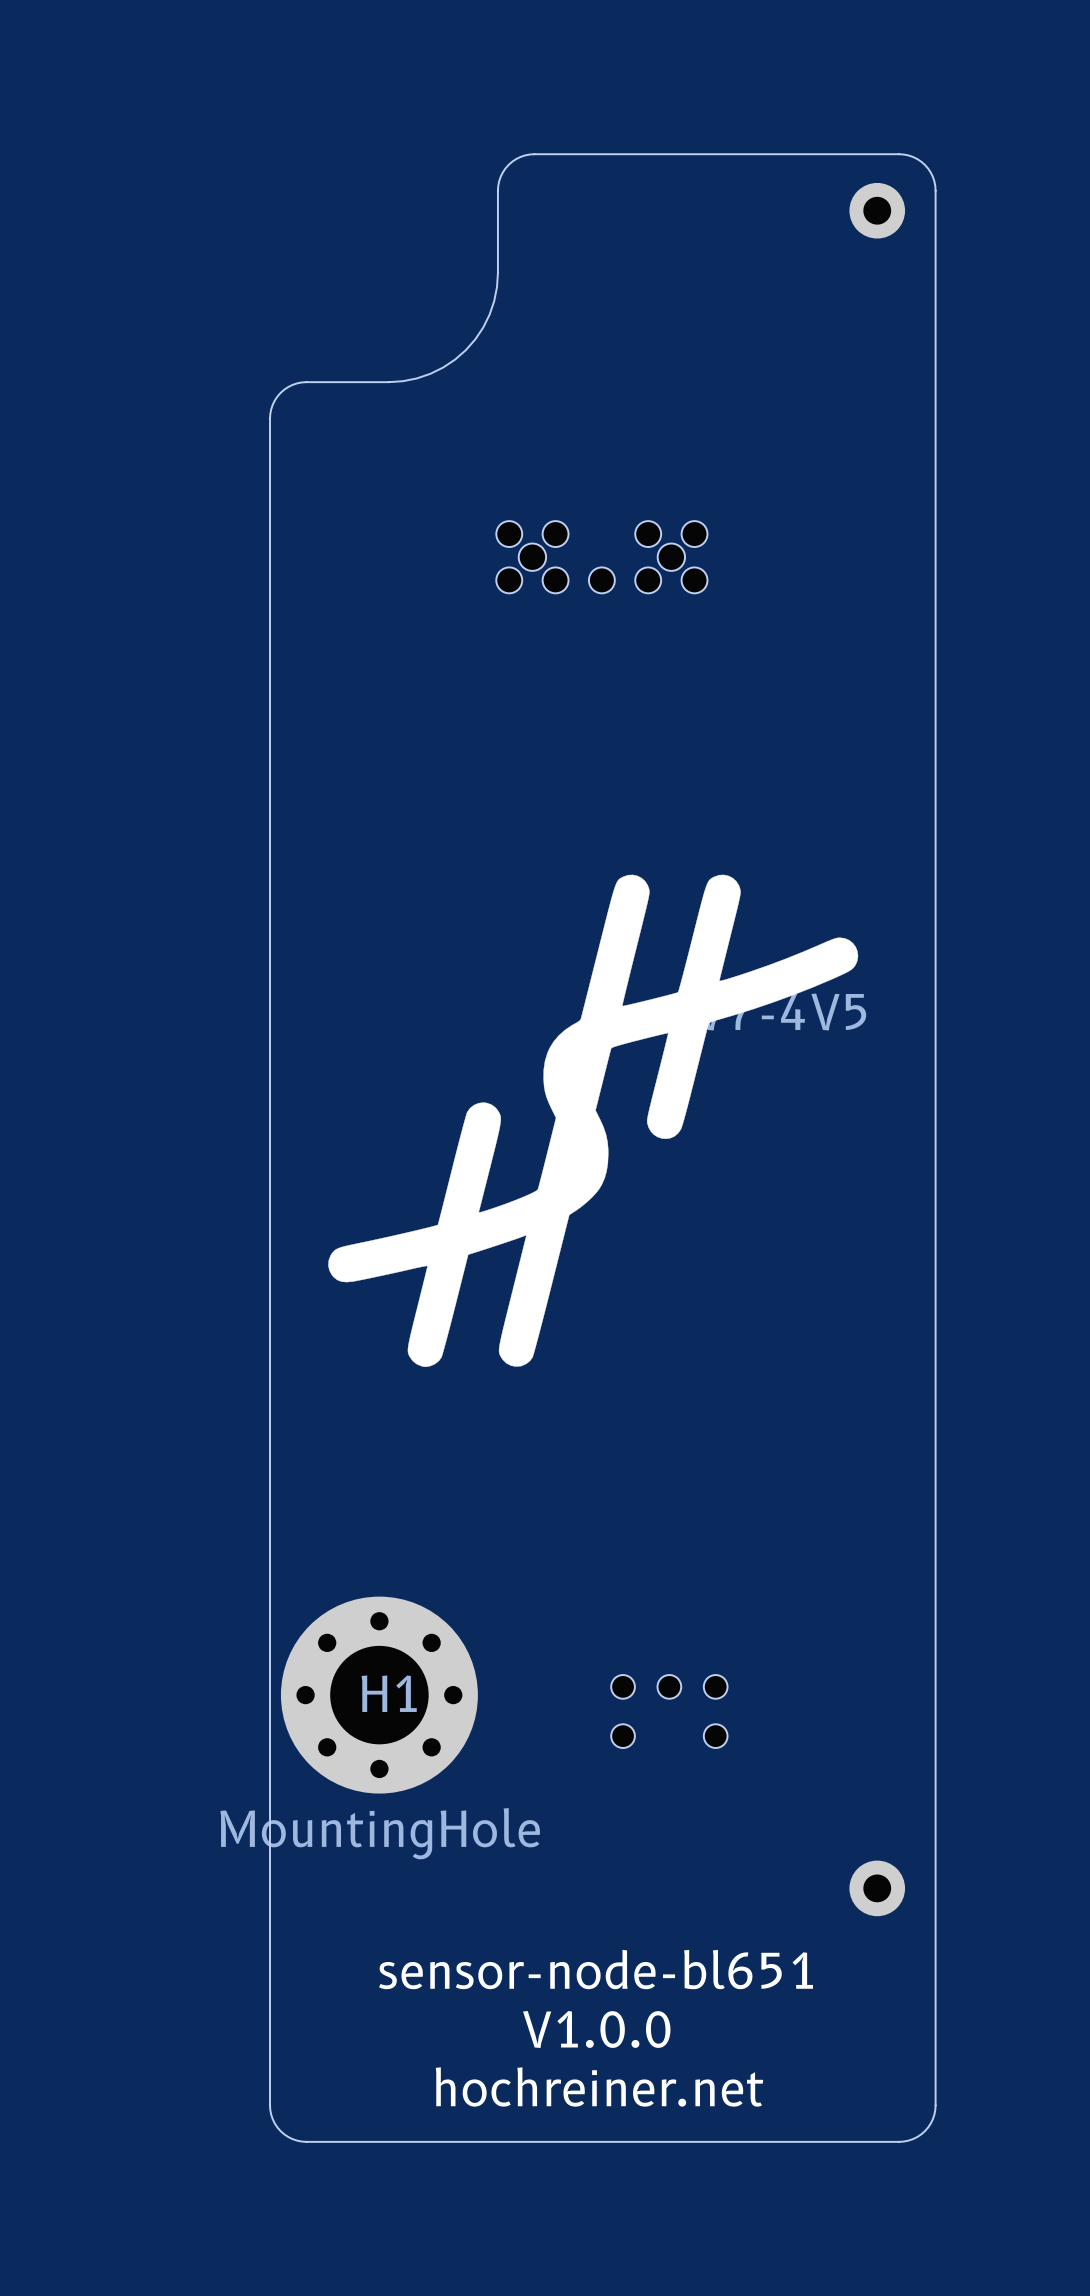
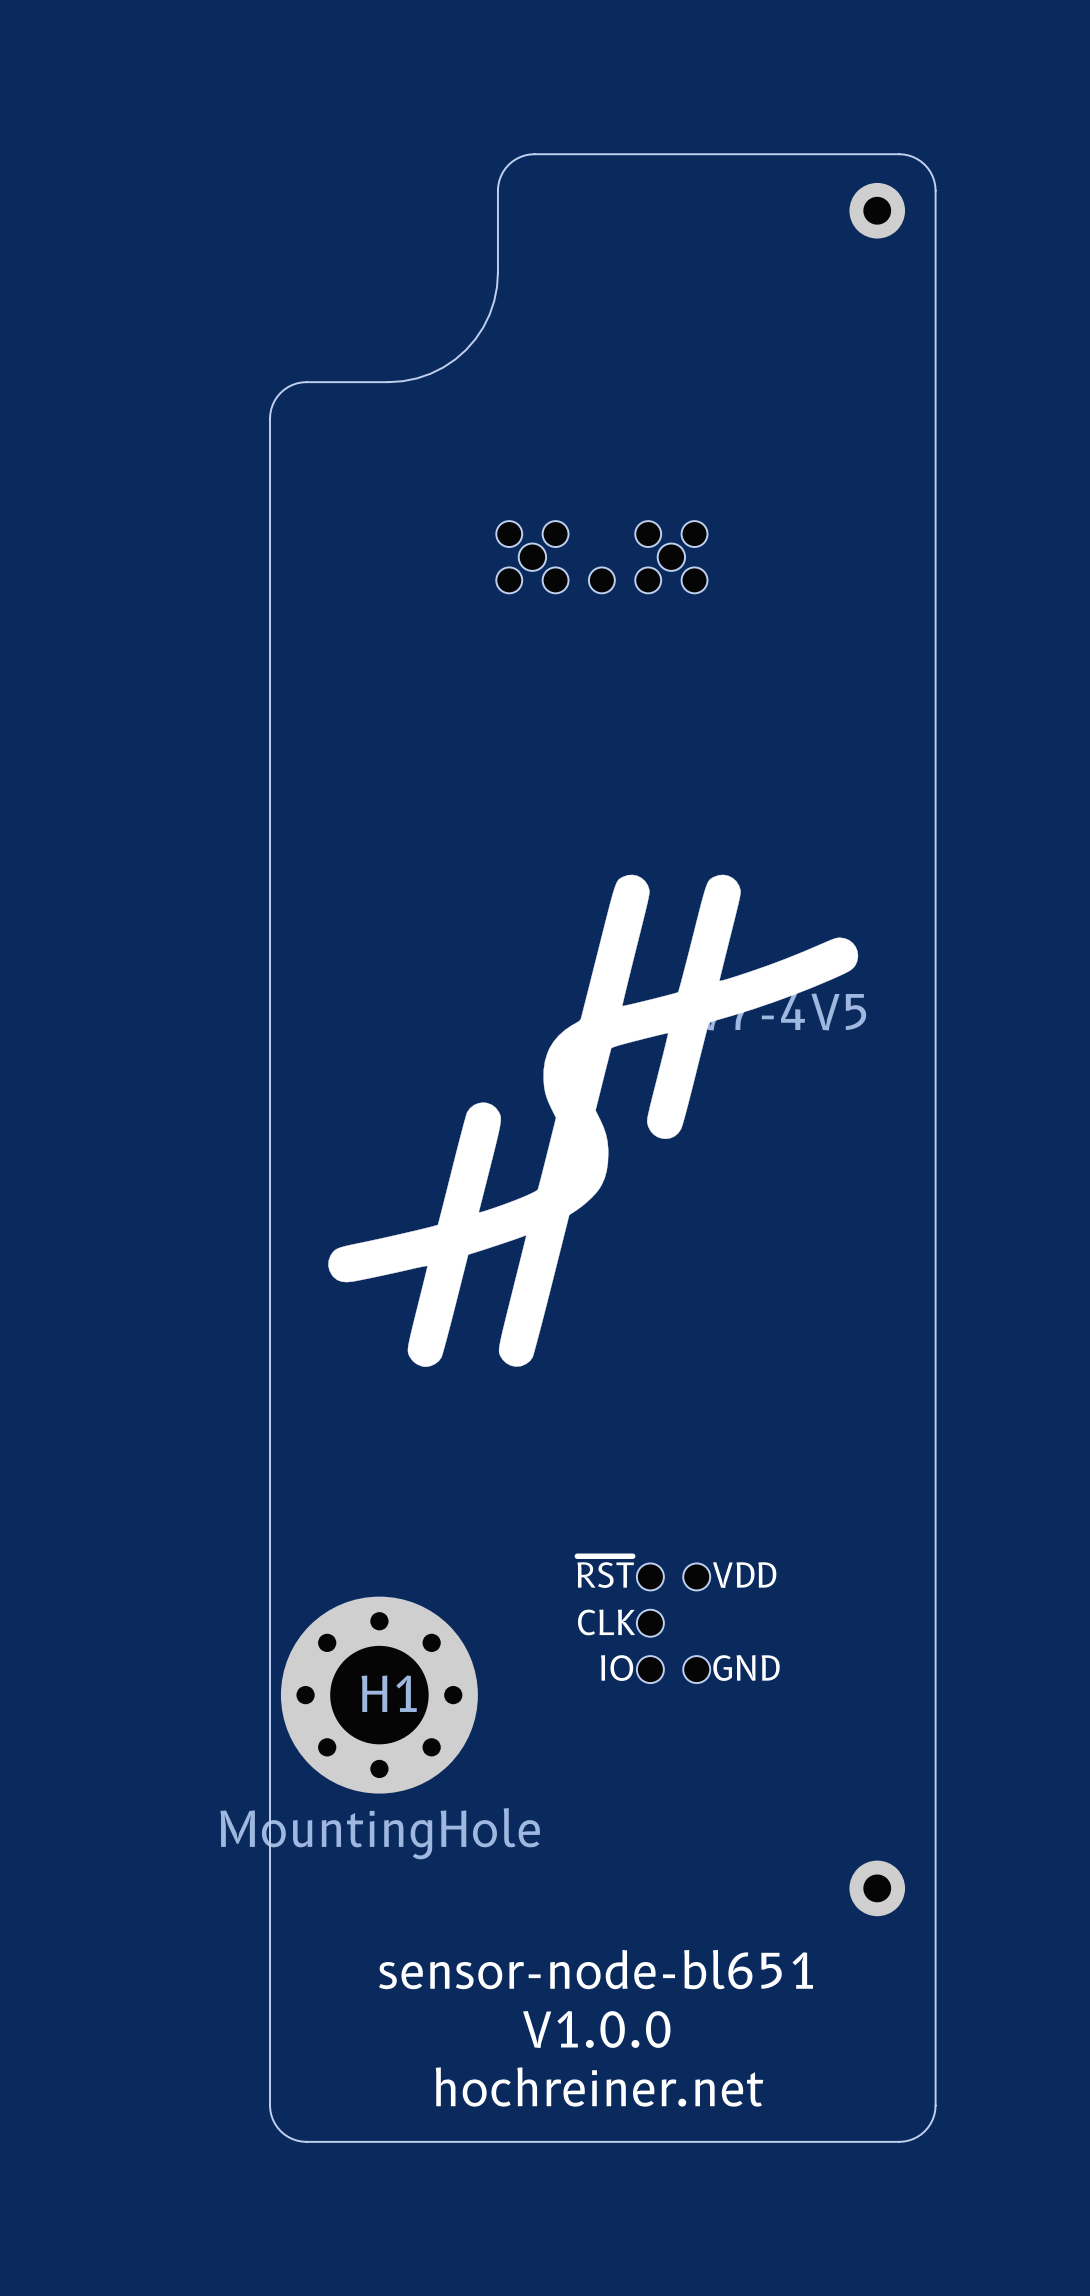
part: none -> (673, 1623)
part: (669, 1711) -> none

